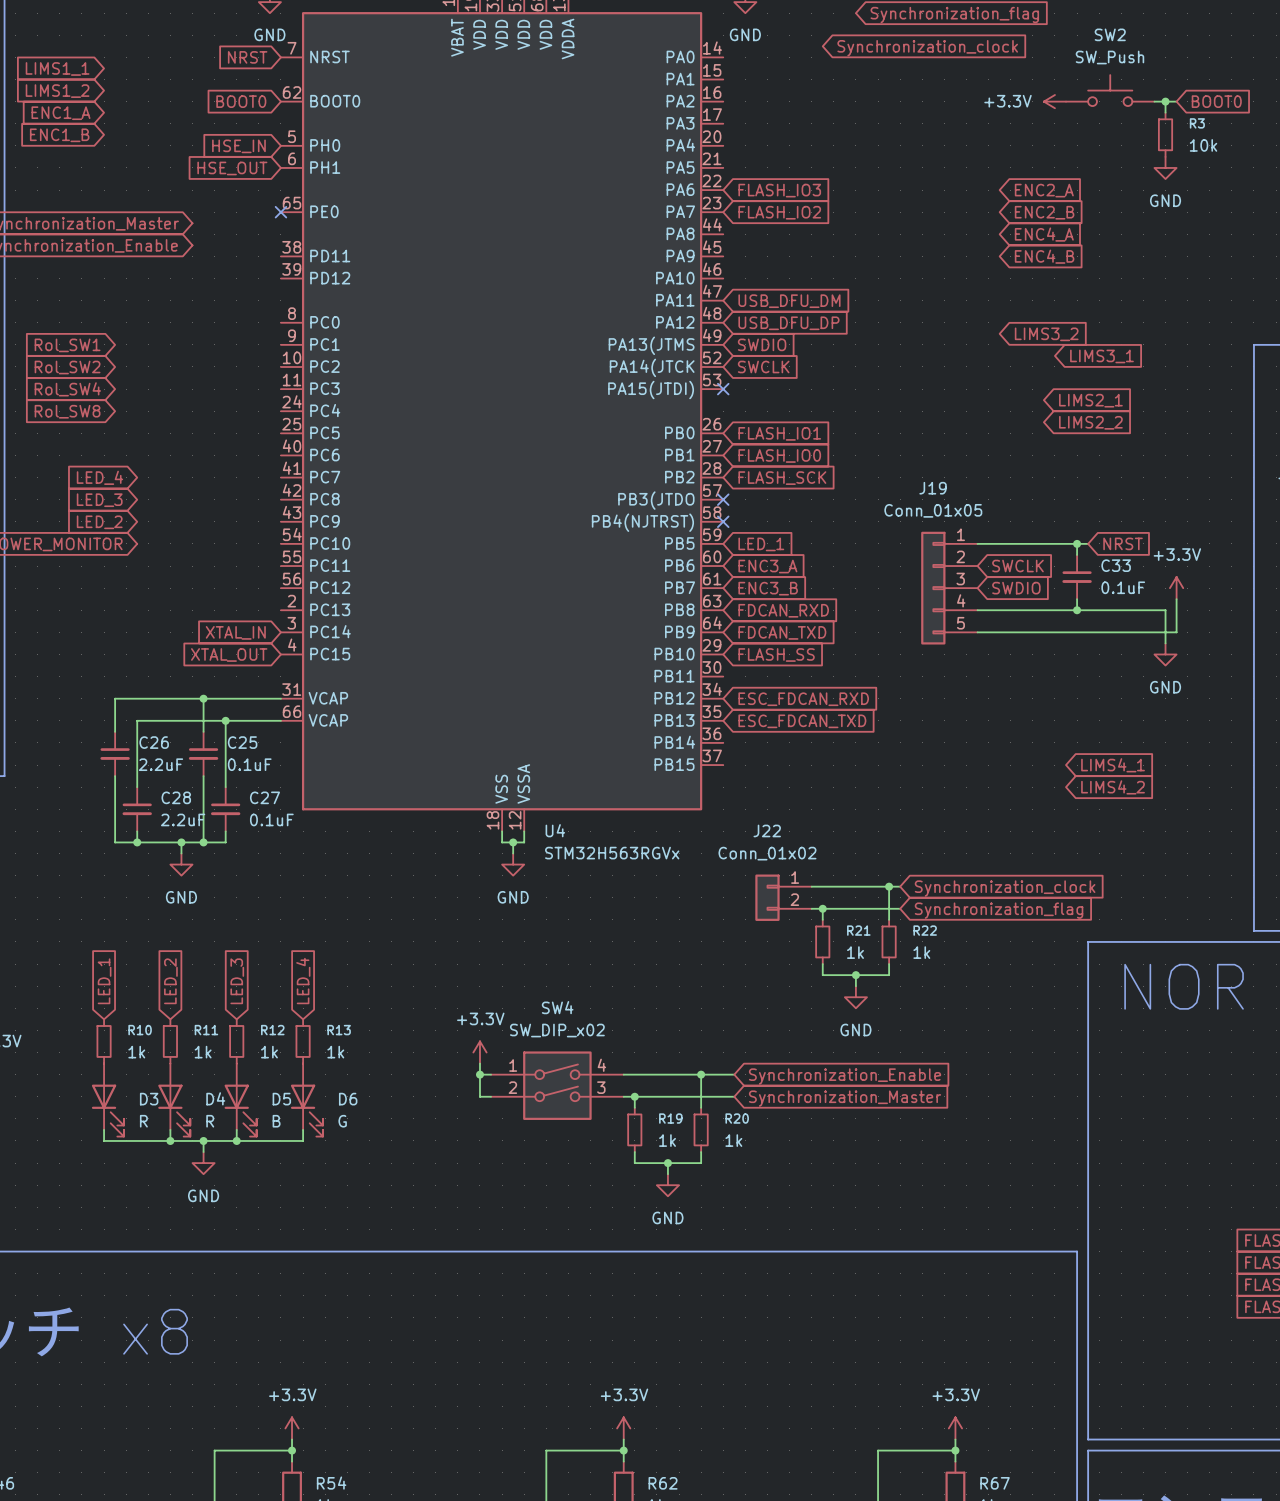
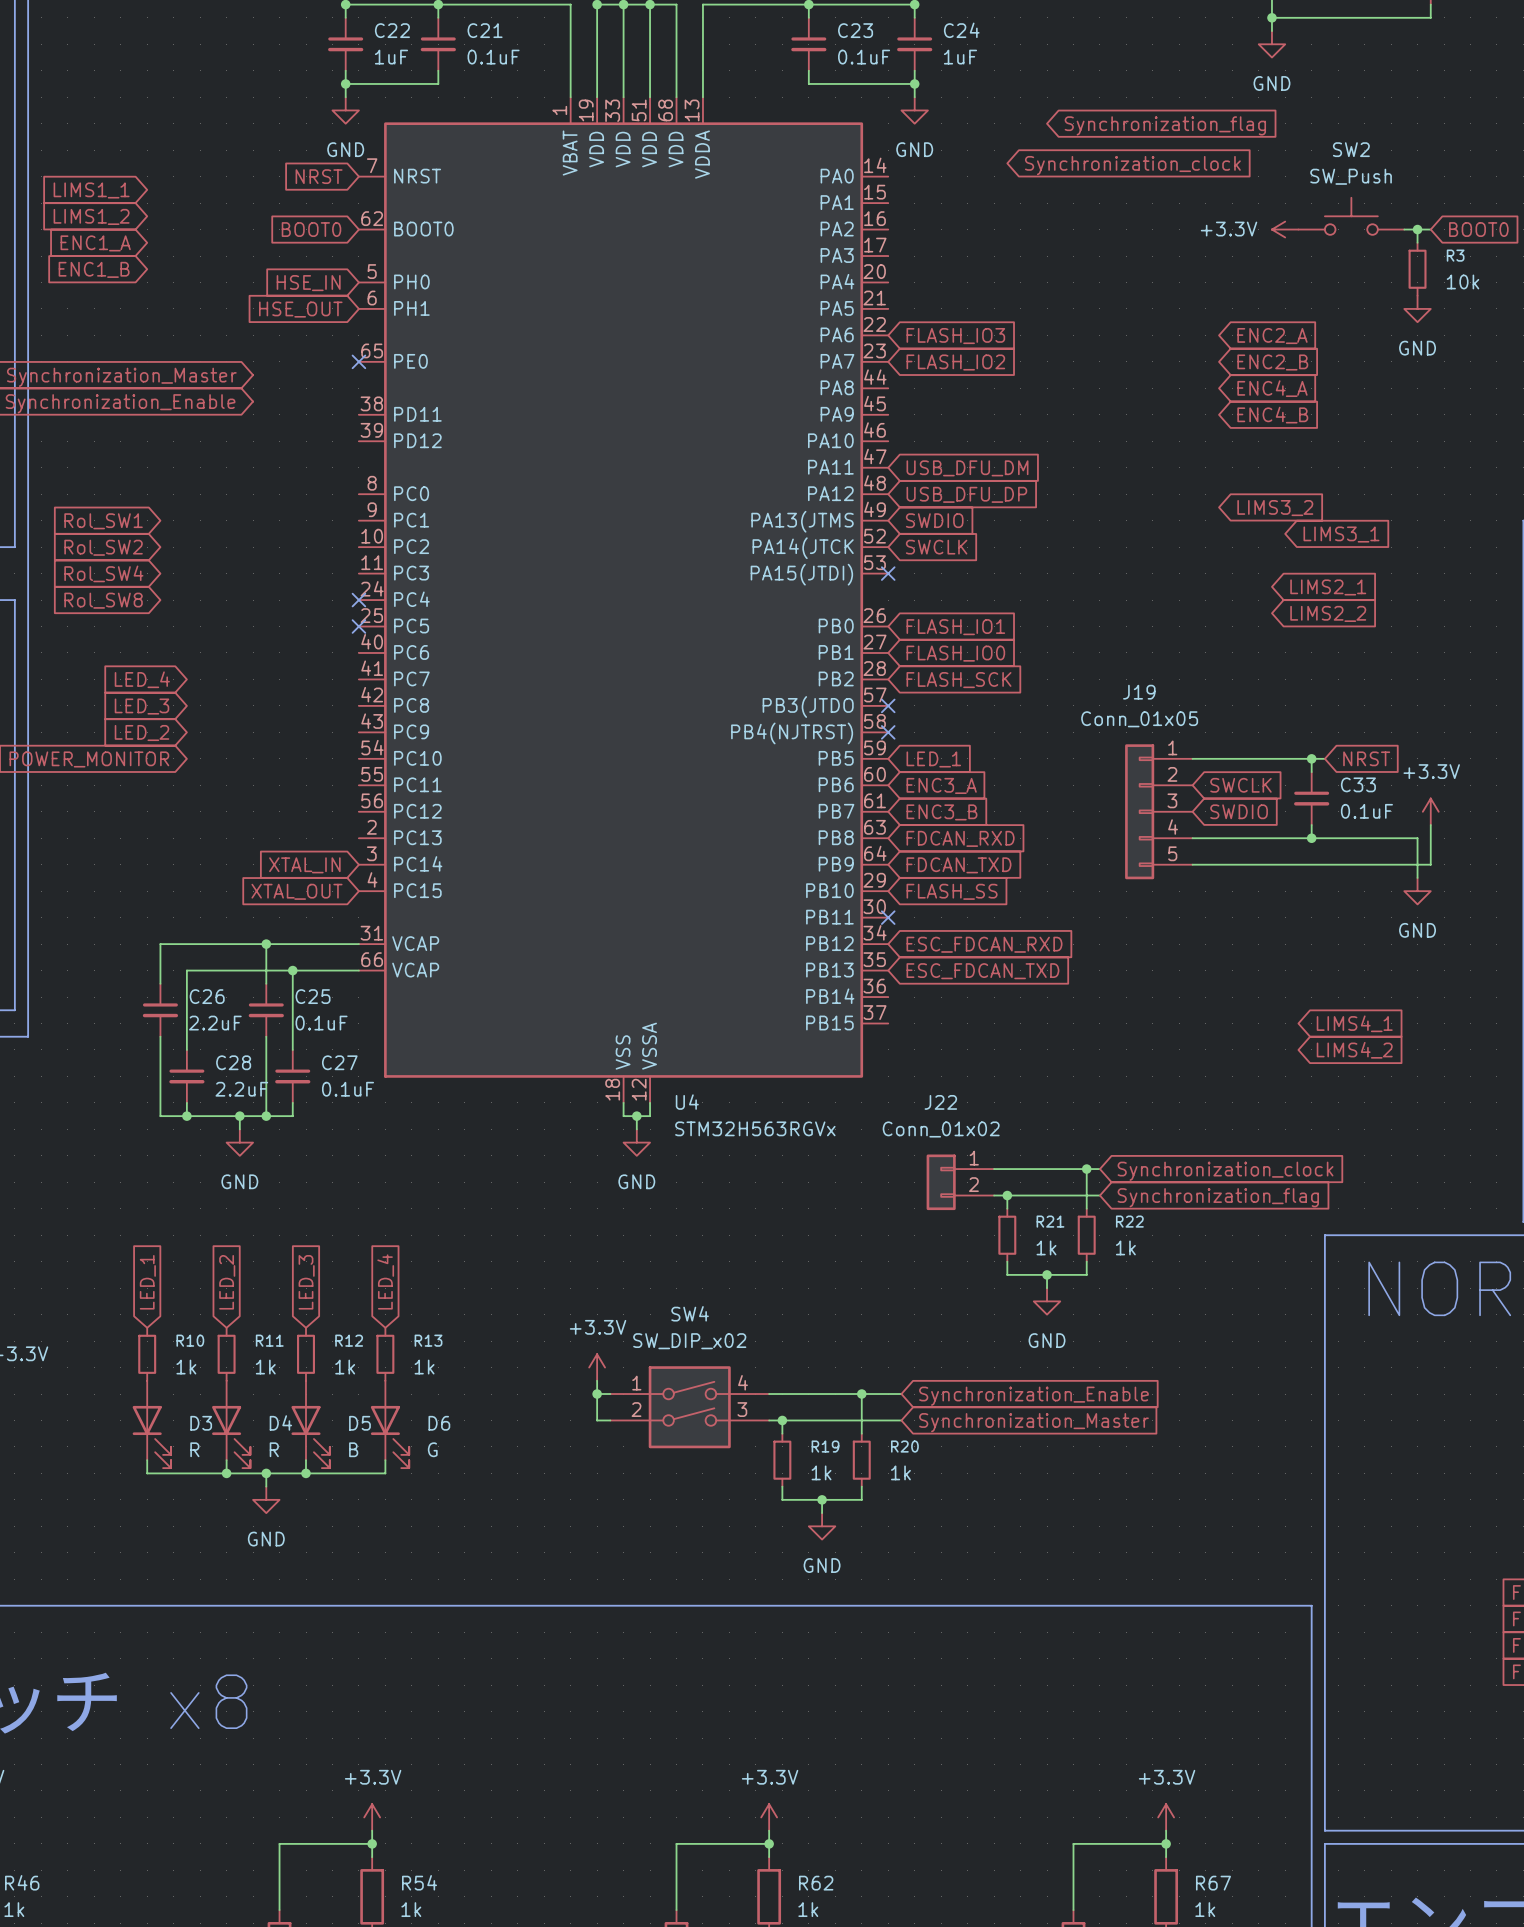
no-connect mark: none -> (358, 600)
no-connect mark: none -> (358, 626)
no-connect mark: none -> (888, 917)

